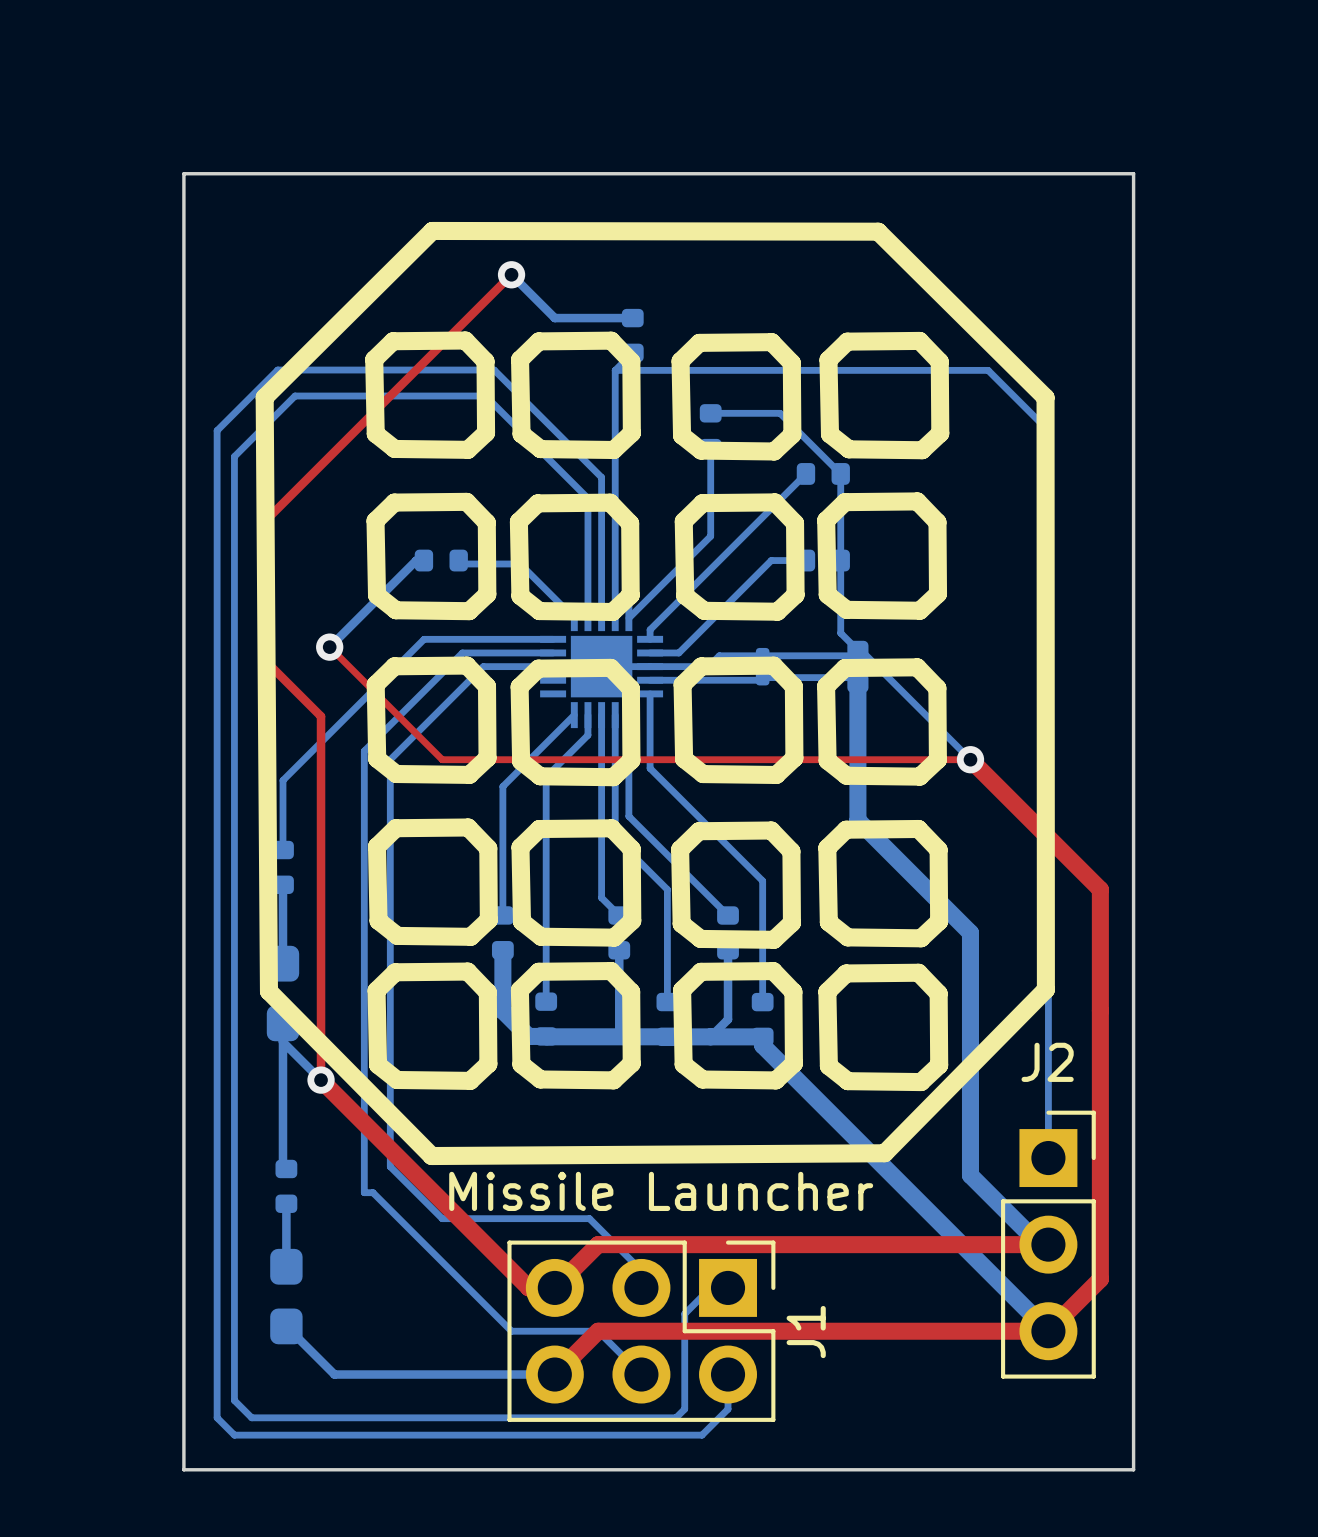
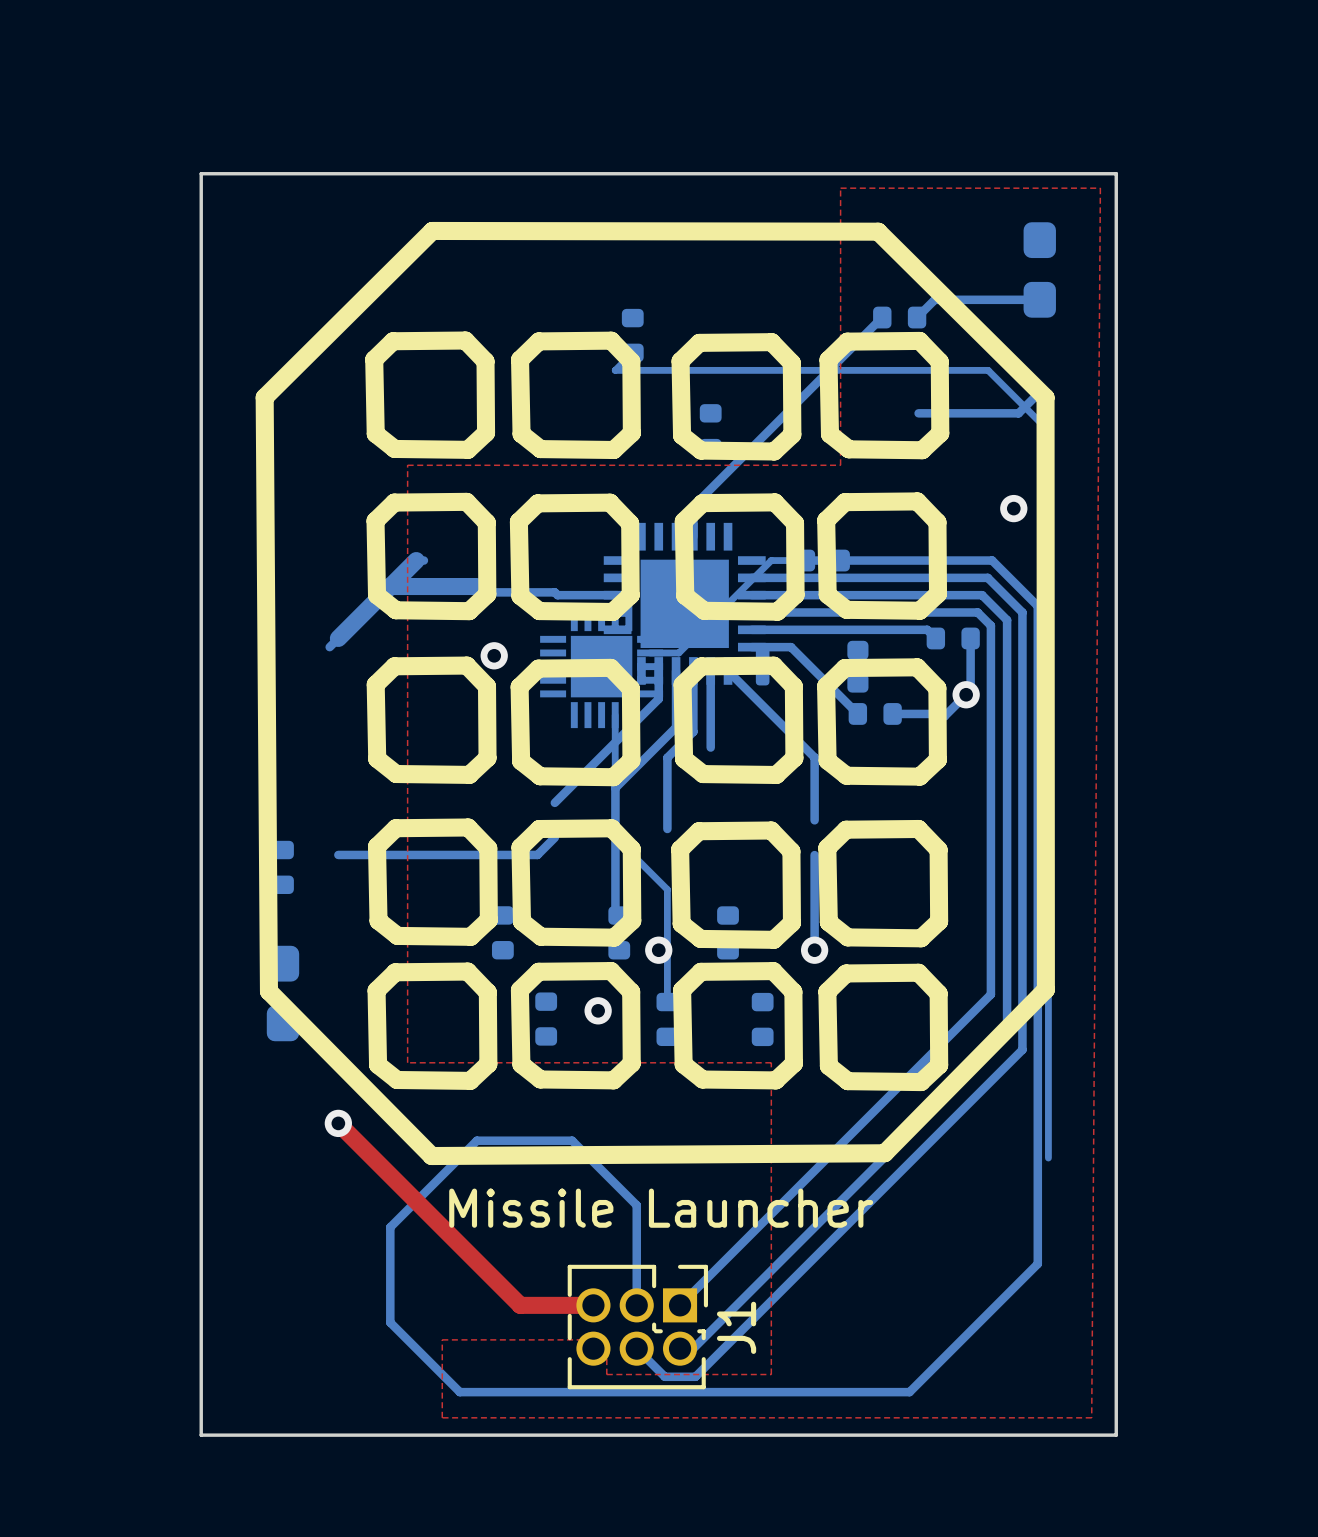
board edge: (201, 173) (183, 173) (183, 1469) (1133, 1469) (1133, 173) (1116, 173) -> (201, 173) (201, 1435) (1116, 1435) (1116, 173)
top zone outline: none -> (840, 188) (840, 465) (407, 465) (407, 1062) (771, 1062) (771, 1374) (606, 1374) (606, 1339) (442, 1339) (442, 1417) (1091, 1417) (1100, 188) (840, 188)
part: none -> (1039, 269)
top track: (511, 274) (269, 517) (269, 664) (321, 716) (321, 1080) (528, 1287) (554, 1287) (598, 1244) (1048, 1244) -> none
bottom track: (511, 274) (554, 318) (632, 318) -> none
via: (511, 274) -> none
bottom track: none -> (1039, 299) (934, 299) (917, 317)
bottom track: none -> (882, 317) (693, 506) (693, 536)
part: none -> (899, 317)
bottom track: (615, 370) (615, 618) -> none
bottom track: none -> (1039, 392) (1018, 413) (918, 413)
bottom track: (710, 413) (780, 413) (840, 473) (840, 633) (857, 650) -> none
bottom track: (710, 448) (710, 536) (628, 618) -> none
bottom track: (805, 473) (650, 629) (650, 639) -> none
part: (823, 473) -> none
via: none -> (1013, 508)
bottom track width: thin (416, 560) (338, 638) -> thick (416, 560) (338, 638)
part: (441, 560) -> none
bottom track: (458, 560) (462, 564) (520, 564) (574, 618) -> none
bottom track: none -> (805, 560) (992, 560) (1037, 606) (1037, 1263) (909, 1392) (459, 1392) (390, 1322) (390, 1227) (476, 1140) (572, 1140) (636, 1205) (636, 1305)
bottom track: none -> (751, 577) (987, 577) (1022, 612) (1022, 1049) (695, 1376) (664, 1376) (636, 1348)
bottom track: none -> (390, 586) (476, 586) (482, 592) (617, 595)
bottom track: none -> (751, 595) (982, 595) (1007, 620) (1007, 1034) (693, 1348)
part: none -> (684, 603)
bottom track: none -> (751, 612) (977, 612) (990, 625) (990, 994) (680, 1305)
bottom track: (587, 618) (587, 498) (485, 396) (295, 396) (234, 456) (234, 1400) (251, 1417) (676, 1417) (684, 1409) (684, 1313) (710, 1287) (728, 1287) -> none
bottom track: (601, 618) (601, 477) (494, 370) (277, 370) (217, 430) (217, 1417) (234, 1435) (702, 1435) (728, 1409) (728, 1374) -> none
bottom track: none -> (751, 629) (927, 629) (935, 638)
part: none -> (953, 638)
bottom track: none -> (970, 638) (970, 690) (944, 716) (942, 713) (892, 713)
bottom track: (553, 639) (424, 639) (282, 780) (282, 850) -> none
top track: (329, 647) (442, 759) (970, 759) (1100, 889) (1100, 1279) (1048, 1331) (598, 1331) (554, 1374) -> none
via position: (329, 647) -> (494, 655)
bottom track: none -> (751, 647) (791, 647) (857, 713)
bottom track: (857, 650) (861, 650) (970, 759) -> none
bottom track: (857, 650) (852, 655) (719, 655) (708, 666) (601, 666) -> none
bottom track: (553, 652) (462, 652) (364, 751) (364, 1192) (372, 1192) (511, 1331) (598, 1331) (641, 1374) -> none
bottom track: (553, 666) (483, 666) (390, 759) (390, 1166) (442, 1218) (589, 1218) (641, 1270) (641, 1287) -> none
bottom track: none -> (658, 670) (658, 698) (554, 802)
bottom track: none -> (676, 670) (676, 727) (615, 788) (615, 906)
bottom track: none -> (693, 670) (693, 731) (667, 757) (667, 828)
bottom track: none -> (710, 670) (710, 747)
bottom track: none -> (728, 670) (814, 757) (814, 820)
bottom track: (650, 680) (852, 677) (857, 683) (857, 820) (970, 932) (970, 1175) (1039, 1244) (1048, 1244) -> none
bottom track: (650, 693) (650, 768) (762, 880) (762, 1002) -> none
part: none -> (875, 713)
bottom track: (574, 715) (502, 786) (502, 915) -> none
bottom track: (587, 715) (587, 735) (546, 777) (546, 1001) -> none
bottom track: (601, 715) (601, 897) (619, 915) -> none
bottom track: (628, 715) (628, 816) (728, 915) -> none
via position: (970, 759) -> (966, 694)
bottom track: none -> (554, 837) (537, 854) (338, 854)
bottom track: none -> (814, 855) (814, 950)
bottom track: (282, 884) (282, 963) -> none
bottom track: (502, 950) (502, 1010) (528, 1036) (546, 1036) -> none
bottom track: (619, 950) (619, 1031) (624, 1036) -> none
via: none -> (658, 950)
bottom track: (728, 950) (728, 1019) (710, 1036) -> none
via: none -> (814, 950)
via: none -> (598, 1010)
bottom track: (282, 1023) (282, 1165) (286, 1168) -> none
bottom track: (546, 1036) (762, 1036) (762, 1045) (1048, 1331) -> none
bottom track: (282, 1042) (321, 1080) -> none
via position: (321, 1080) -> (338, 1123)
top track: none -> (338, 1123) (520, 1305) (593, 1305)
part: (286, 1186) -> none
text position: Missile Launcher (661, 1191) -> Missile Launcher (661, 1208)
bottom track: (286, 1203) (286, 1266) -> none
J1 footprint: [507, 1240, 776, 1422] -> [567, 1264, 708, 1390]
J2: (1048, 1244) -> none
part: (286, 1296) -> none
bottom track: (286, 1326) (334, 1374) (554, 1374) -> none

